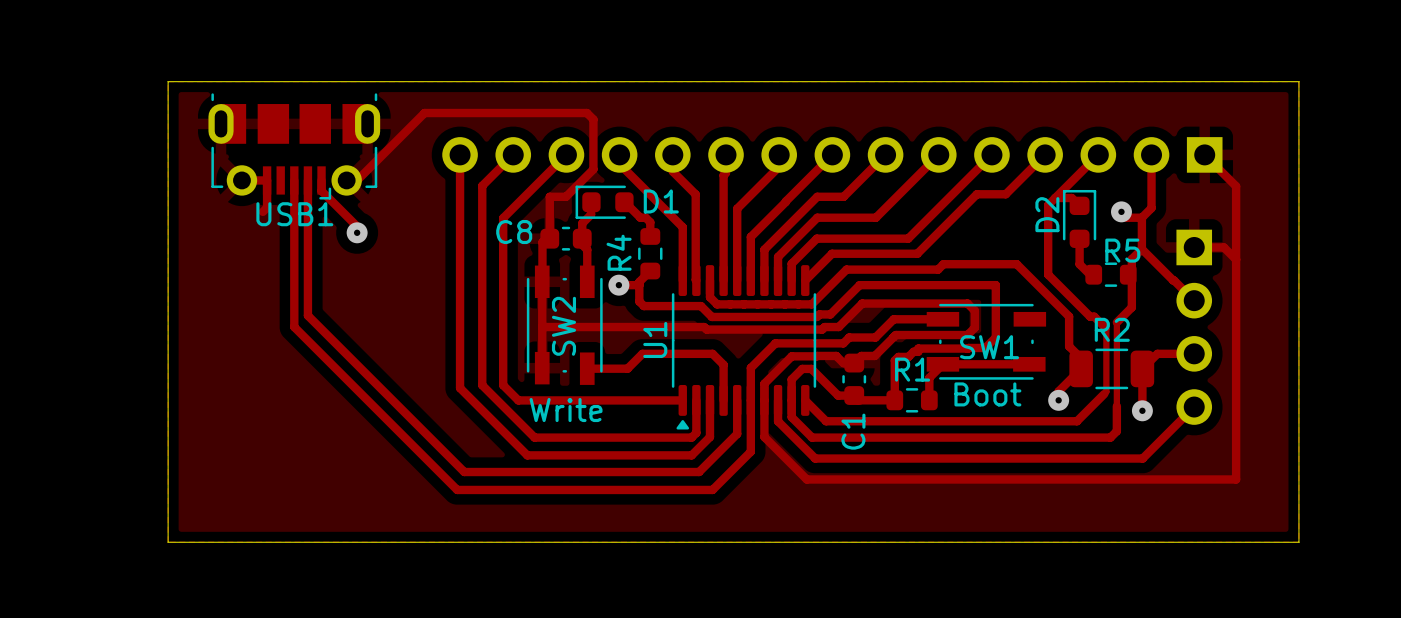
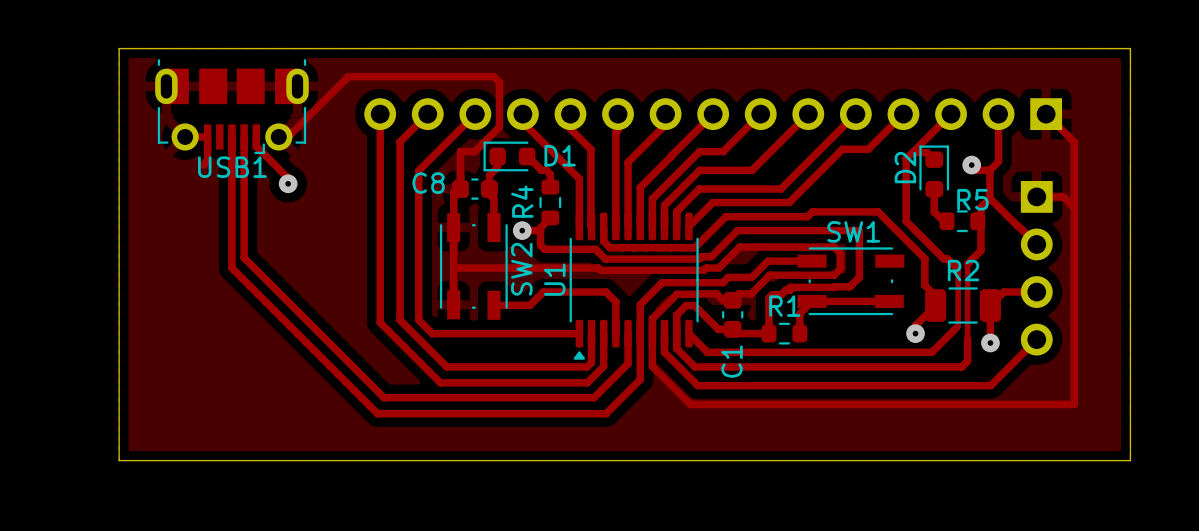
SW2 name position: SW2 (563, 326) -> SW2 (521, 269)
SW1 name position: SW1 (989, 347) -> SW1 (853, 231)
SW1 value: Boot (987, 394) -> none
SW2 value: Write (566, 410) -> none

